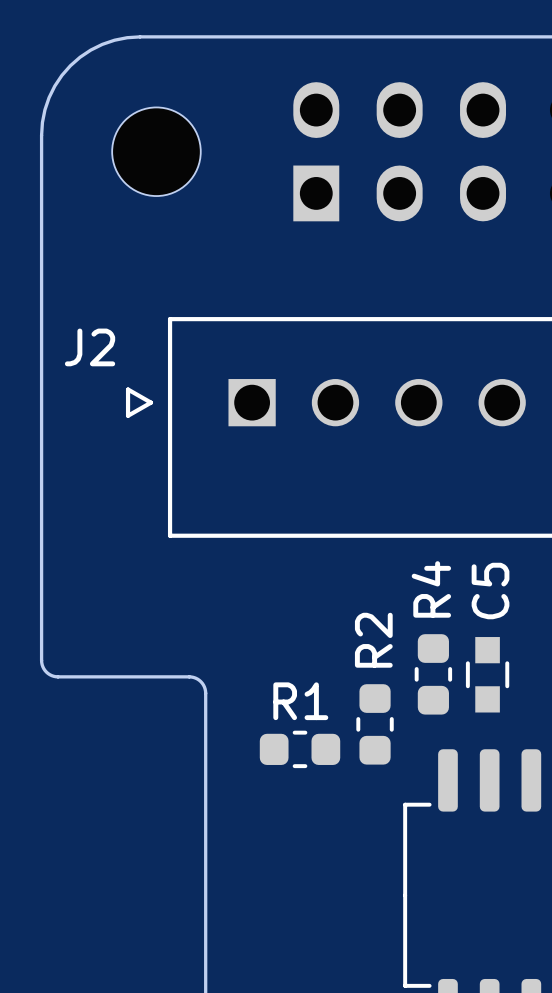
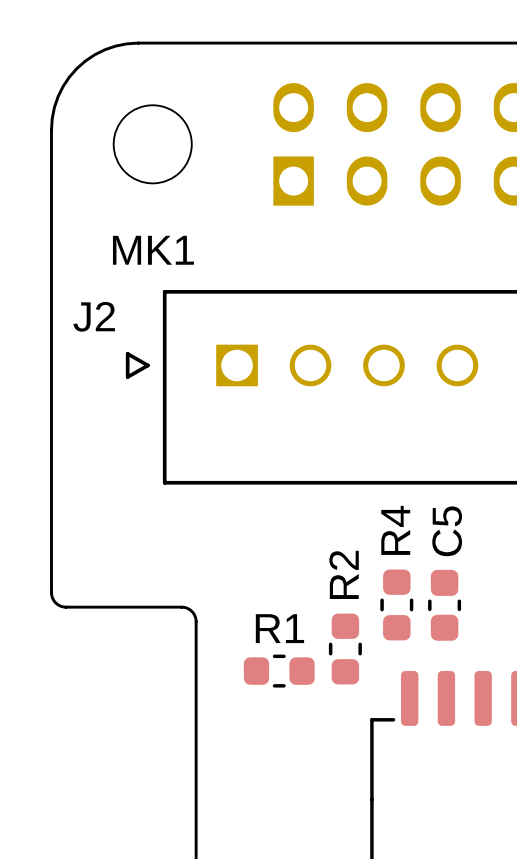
MK1 name: none -> MK1 (153, 250)
C5 footprint: [465, 637, 510, 713] -> [428, 569, 462, 641]

